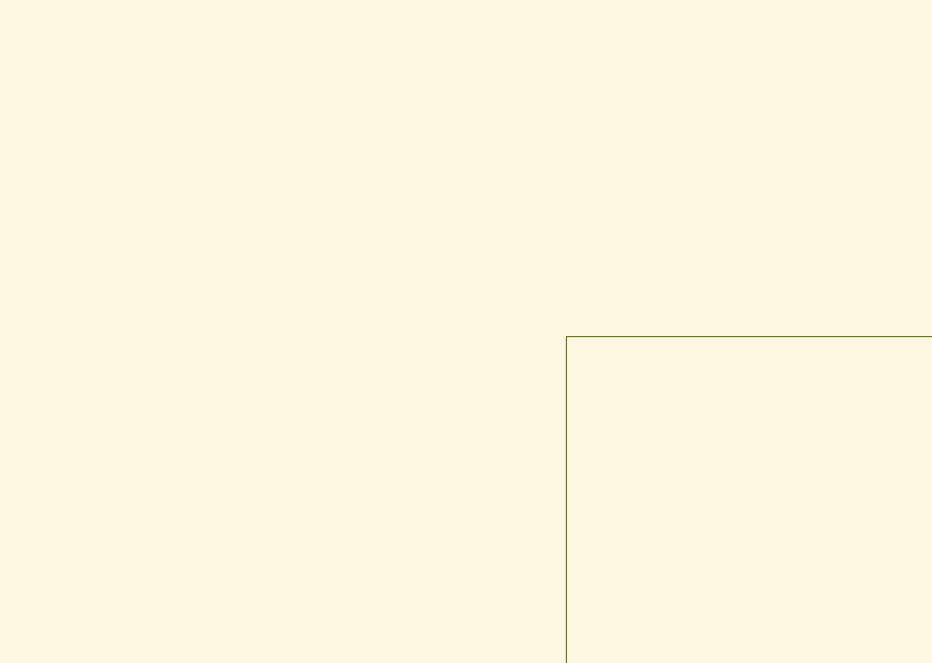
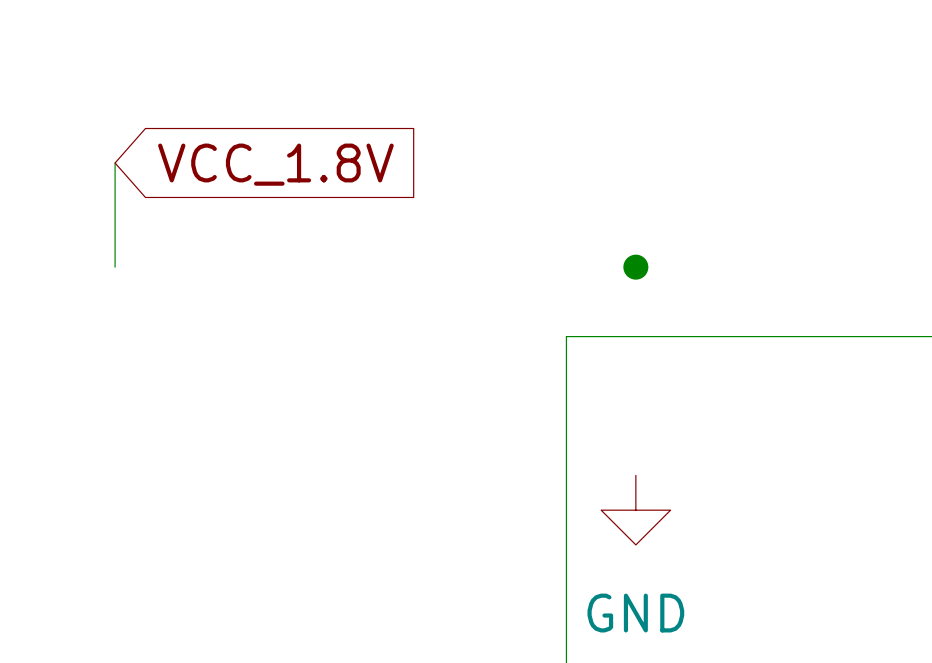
wire: none -> (115, 162) (115, 267)
global label: none -> VCC_1.8V (275, 164)
junction: none -> (635, 267)
power symbol: none -> GND (635, 510)

